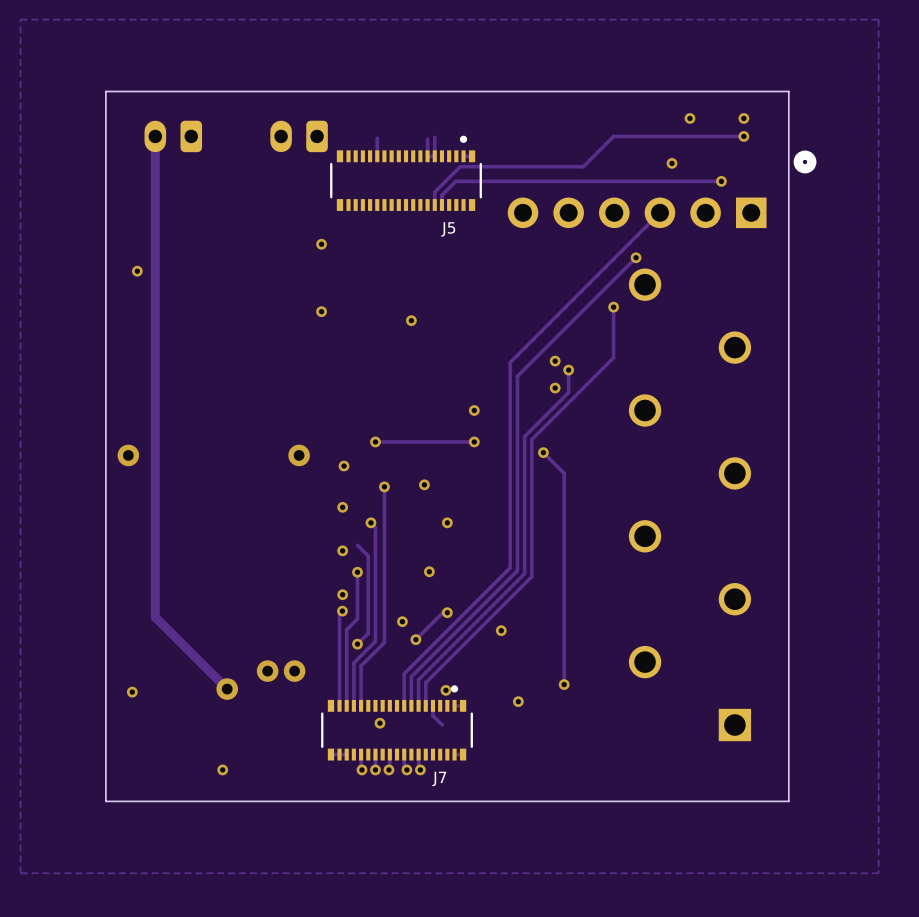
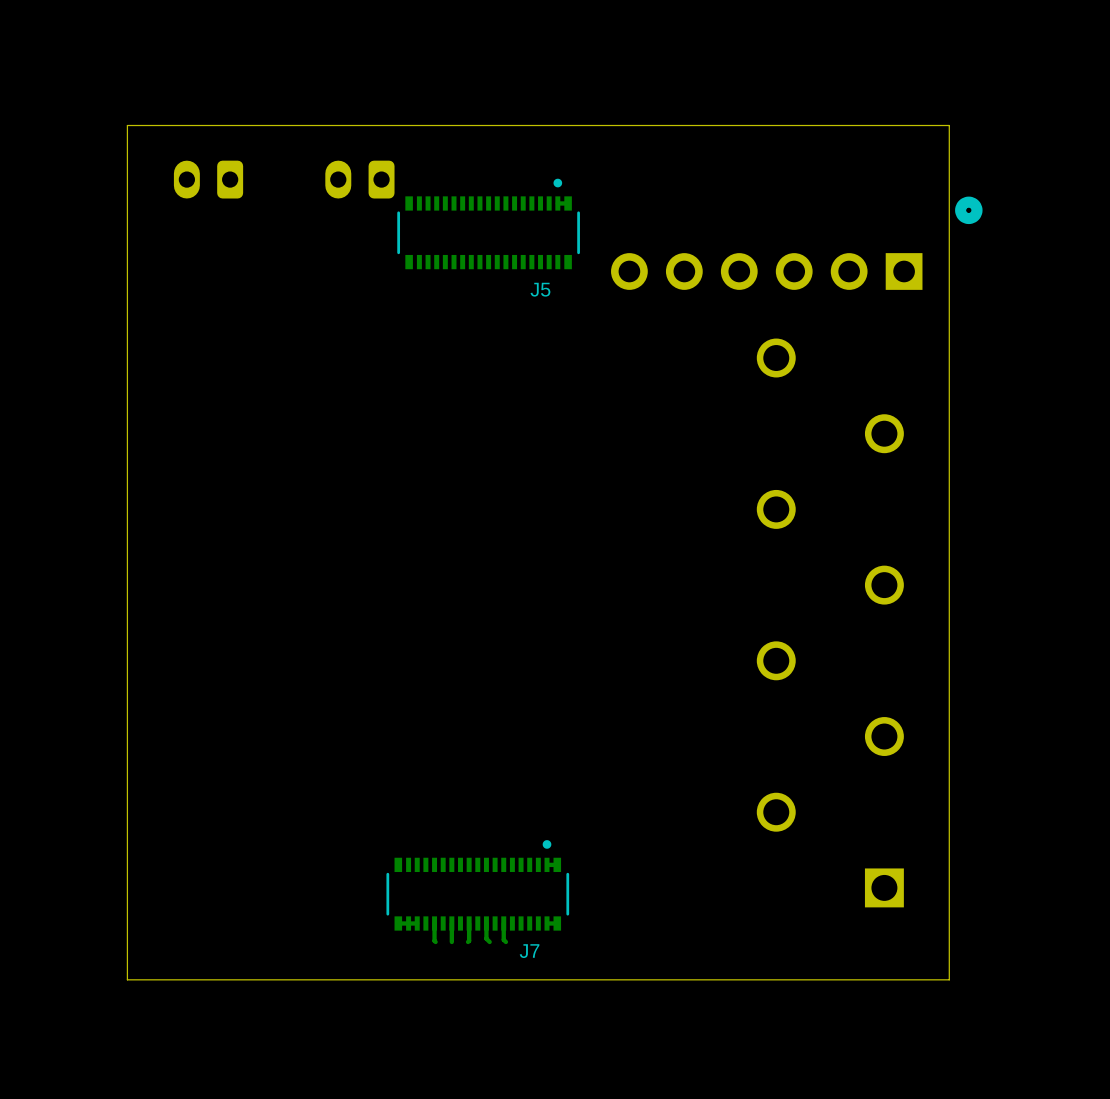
zone outline: (878, 19) (878, 873) (20, 873) (20, 19) (878, 19) -> none
via: (689, 118) -> none
via: (743, 118) -> none
track: (155, 136) (155, 617) (227, 689) -> none
track: (743, 136) (613, 136) (583, 166) (460, 166) (434, 192) (434, 204) -> none
via: (743, 136) -> none
track: (434, 137) (434, 156) (427, 156) (427, 139) -> none
track: (377, 138) (377, 156) -> none
via: (672, 163) -> none
track: (721, 181) (455, 181) (441, 195) (441, 204) -> none
via: (721, 181) -> none
track: (659, 212) (510, 362) (510, 567) (404, 673) (404, 705) -> none
via: (321, 244) -> none
track: (636, 257) (517, 376) (517, 570) (411, 676) (411, 705) -> none
via: (636, 257) -> none
via: (137, 271) -> none
track: (613, 307) (613, 357) (531, 439) (531, 576) (425, 682) (425, 705) -> none
via: (613, 307) -> none
via: (321, 311) -> none
via: (411, 320) -> none
via: (555, 361) -> none
track: (568, 370) (568, 392) (524, 436) (524, 573) (418, 679) (418, 705) -> none
via: (568, 370) -> none
via: (555, 388) -> none
via: (474, 410) -> none
via: (375, 441) -> none
track: (474, 441) (375, 441) -> none
via: (474, 441) -> none
track: (543, 452) (564, 473) (564, 684) -> none
via: (543, 452) -> none
via: (128, 455) -> none
via: (299, 455) -> none
via: (344, 466) -> none
via: (424, 484) -> none
track: (384, 486) (384, 642) (361, 665) (361, 705) -> none
via: (384, 486) -> none
via: (342, 507) -> none
track: (370, 522) (375, 527) (375, 641) (353, 662) (353, 705) -> none
via: (370, 522) -> none
via: (447, 522) -> none
track: (357, 545) (368, 556) (368, 633) (357, 644) -> none
via: (342, 550) -> none
via: (429, 571) -> none
track: (357, 572) (357, 618) (346, 629) (346, 705) -> none
via: (357, 572) -> none
via: (342, 594) -> none
track: (342, 611) (339, 614) (339, 705) -> none
via: (342, 611) -> none
track: (447, 612) (442, 612) (415, 639) -> none
via: (447, 612) -> none
via: (402, 621) -> none
via: (501, 630) -> none
via: (415, 639) -> none
via: (357, 644) -> none
via: (267, 671) -> none
via: (294, 671) -> none
via: (564, 684) -> none
via: (227, 689) -> none
via: (445, 690) -> none
via: (132, 692) -> none
via: (518, 701) -> none
track: (432, 705) (432, 715) (442, 725) -> none
via: (379, 723) -> none
via: (222, 769) -> none
via: (361, 769) -> none
via: (375, 769) -> none
via: (388, 769) -> none
via: (406, 769) -> none
via: (420, 769) -> none

